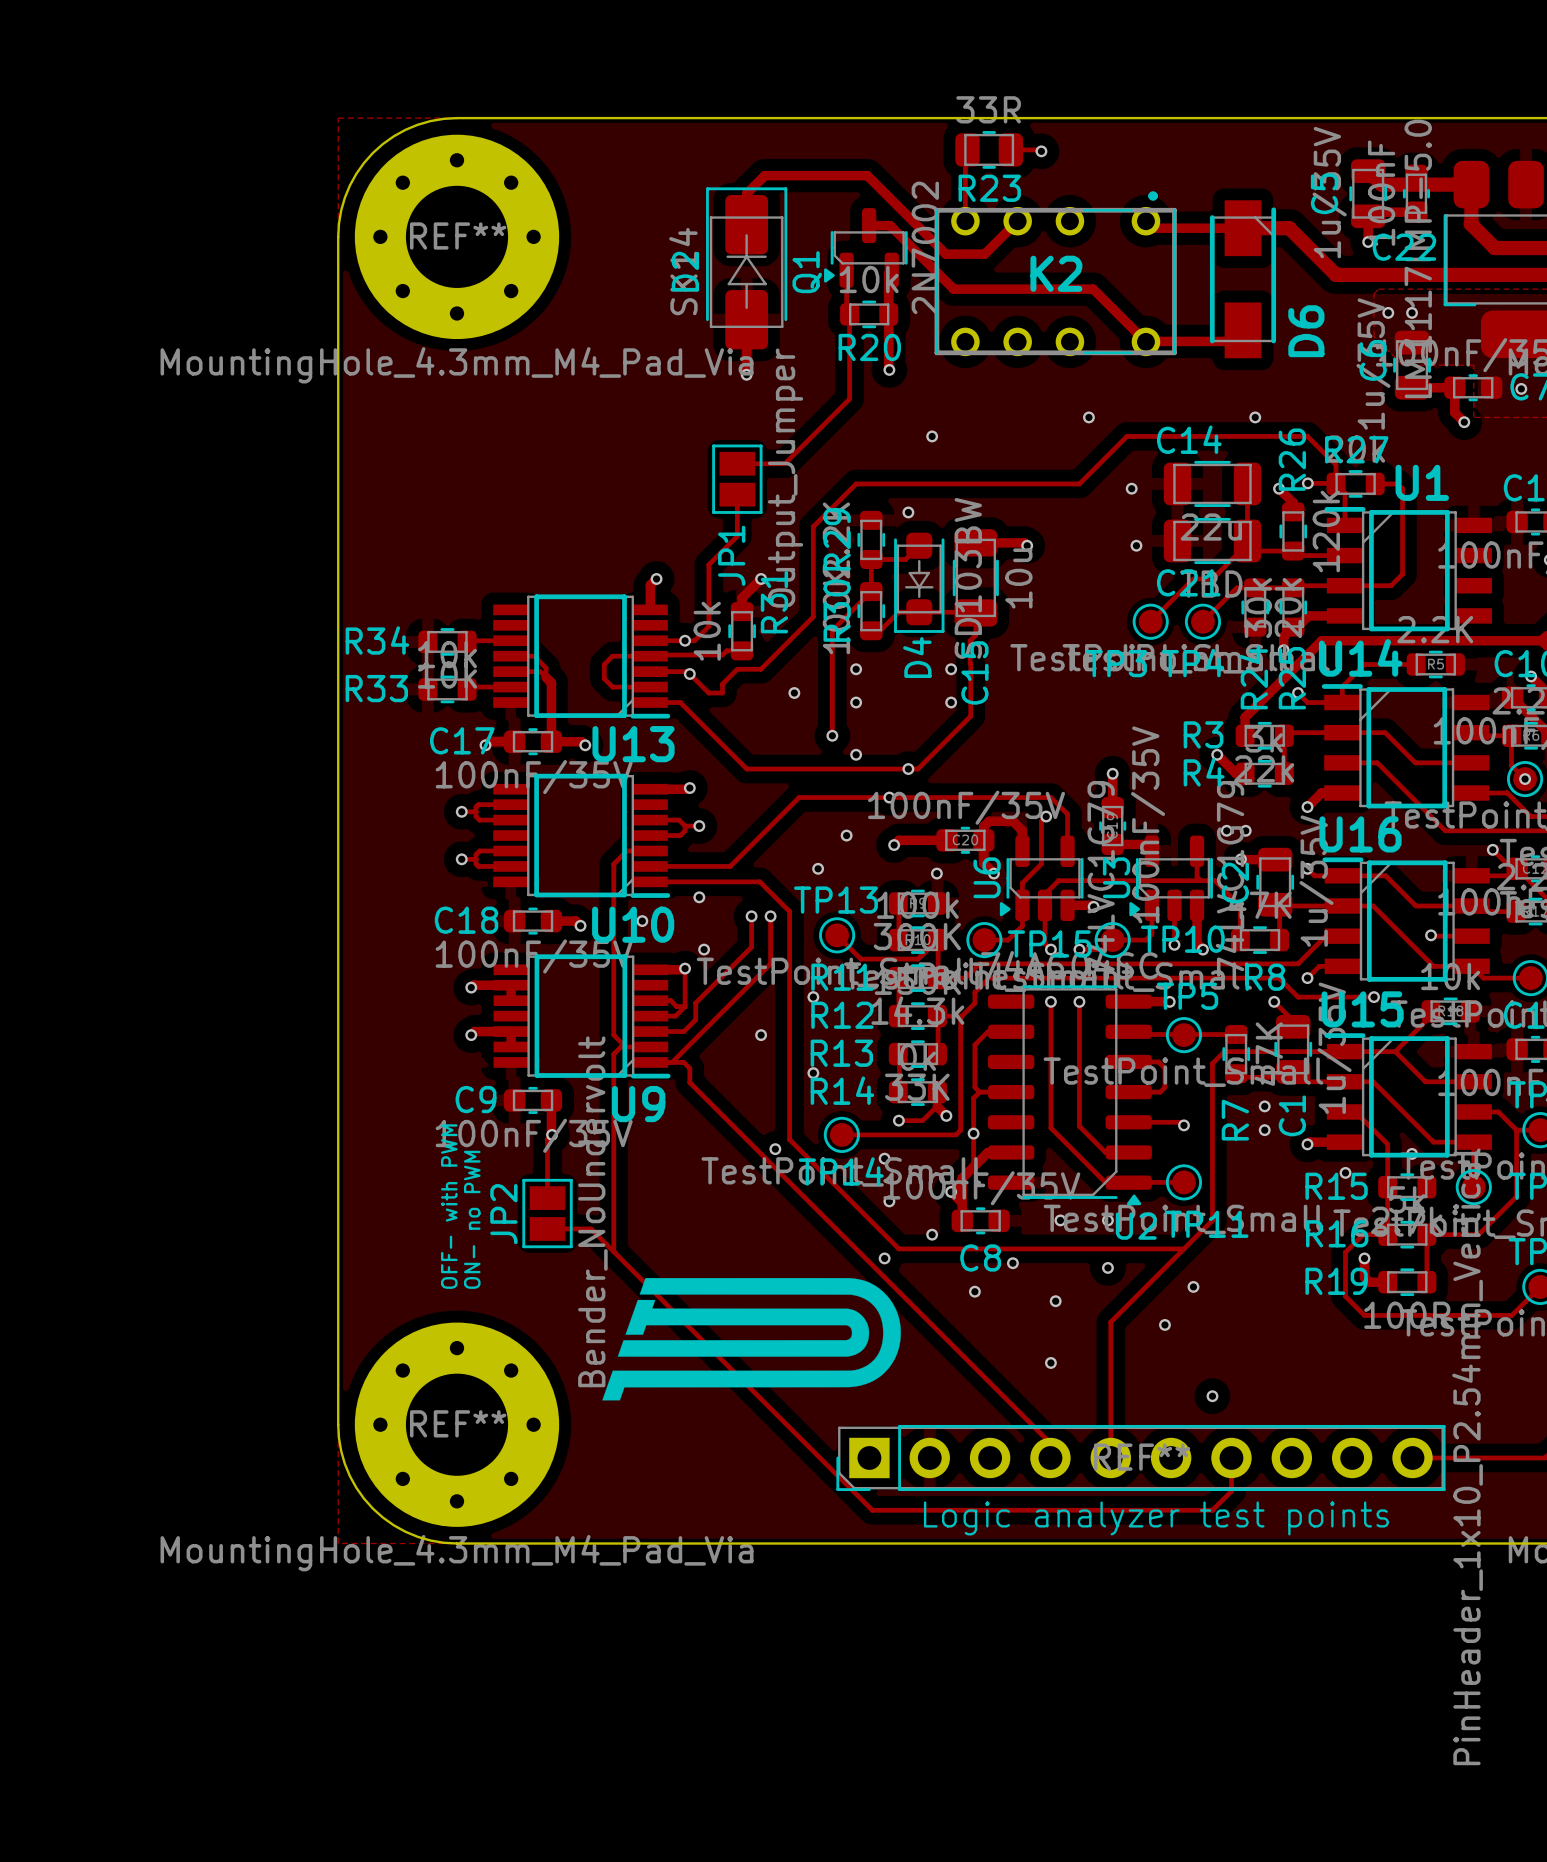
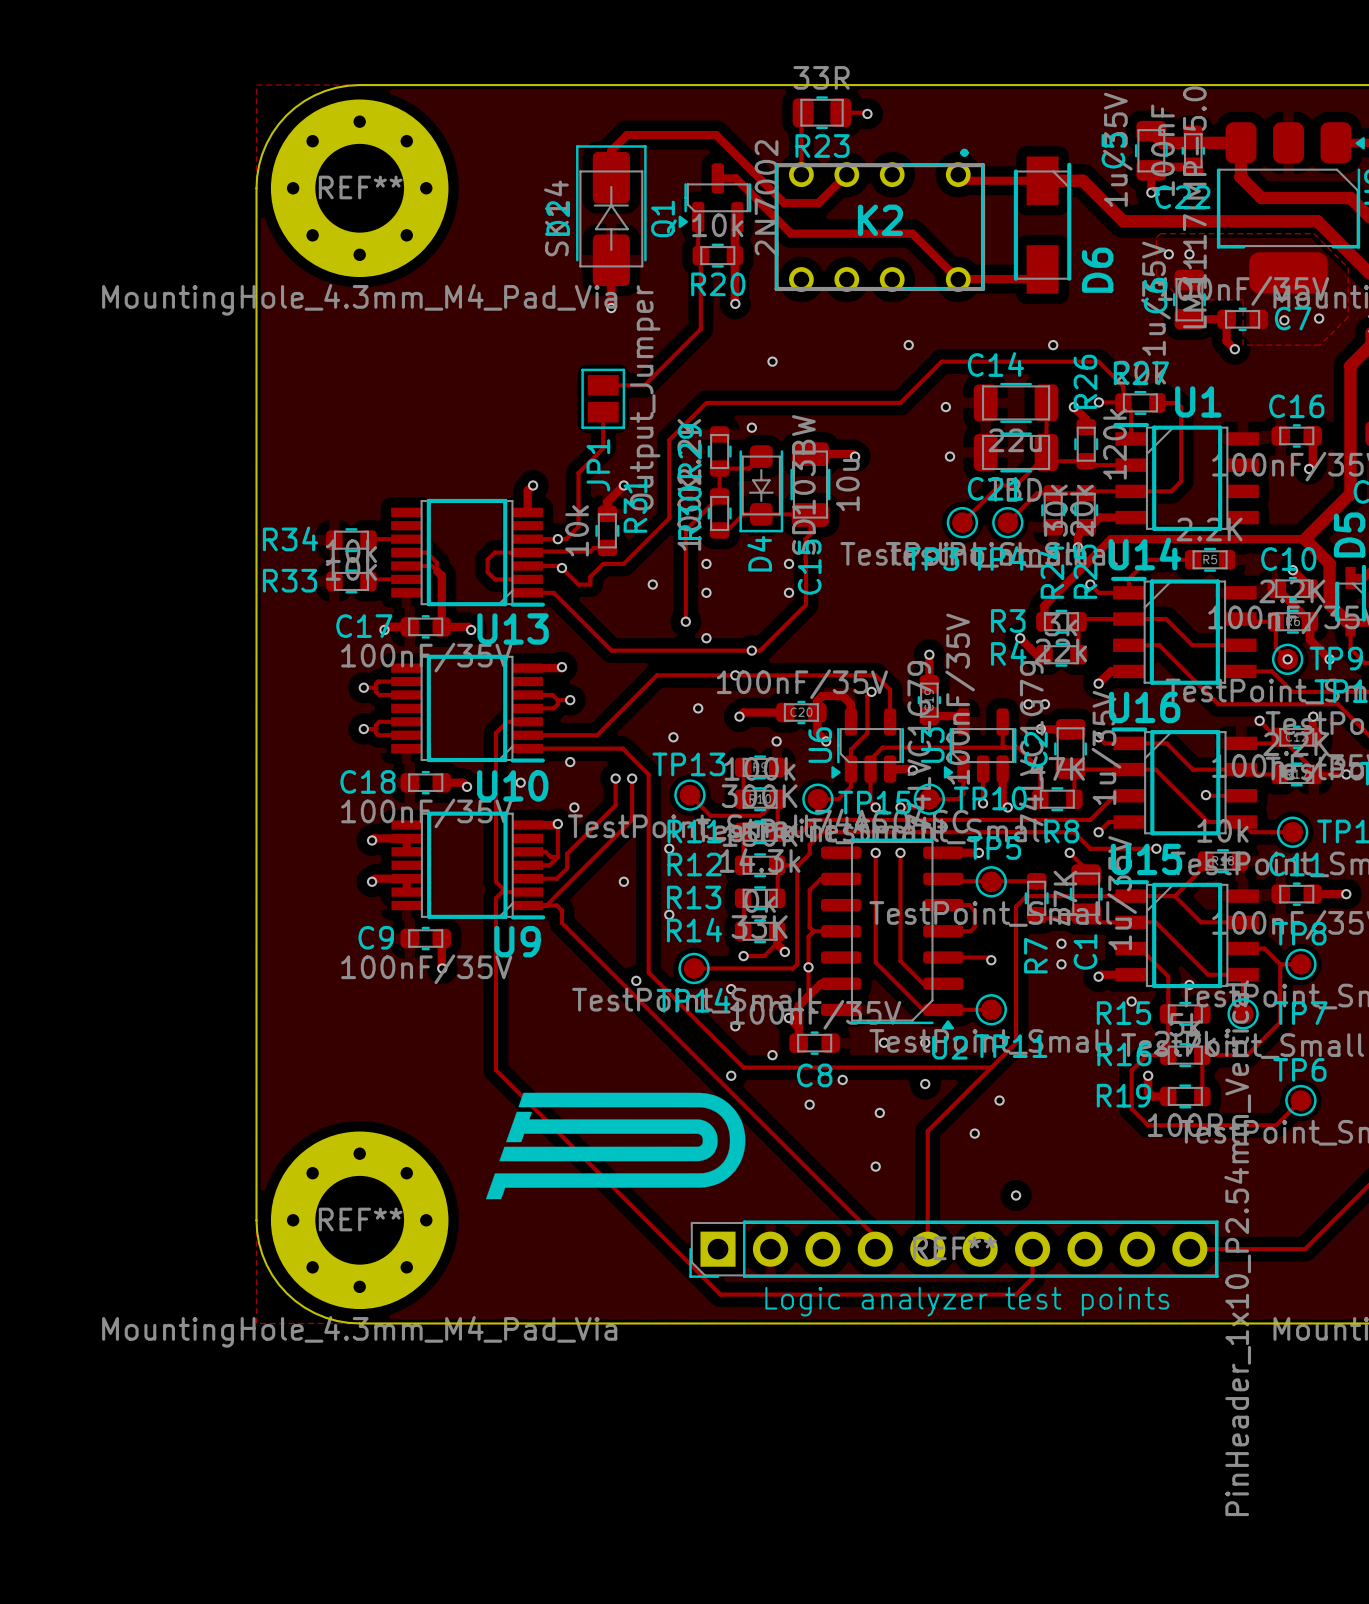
track: (552, 1134) (547, 1139) (547, 1198) -> none
text: OFF- with PWM (449, 1206) -> none
JP2: Bender_NoUndervolt (547, 1213) -> none
text: ON- no PWM (472, 1219) -> none
track: (547, 1228) (590, 1228) (613, 1251) -> none

